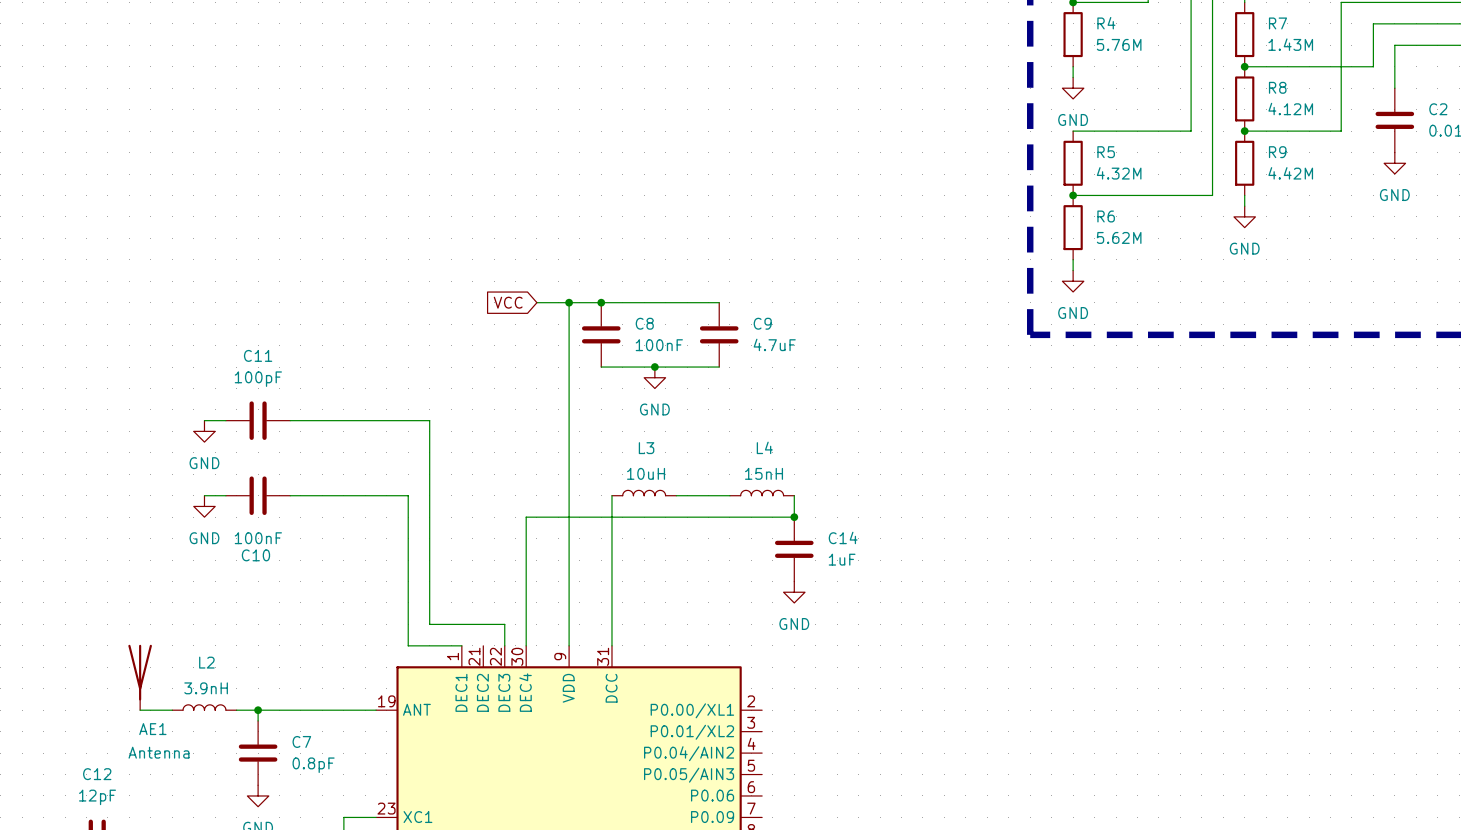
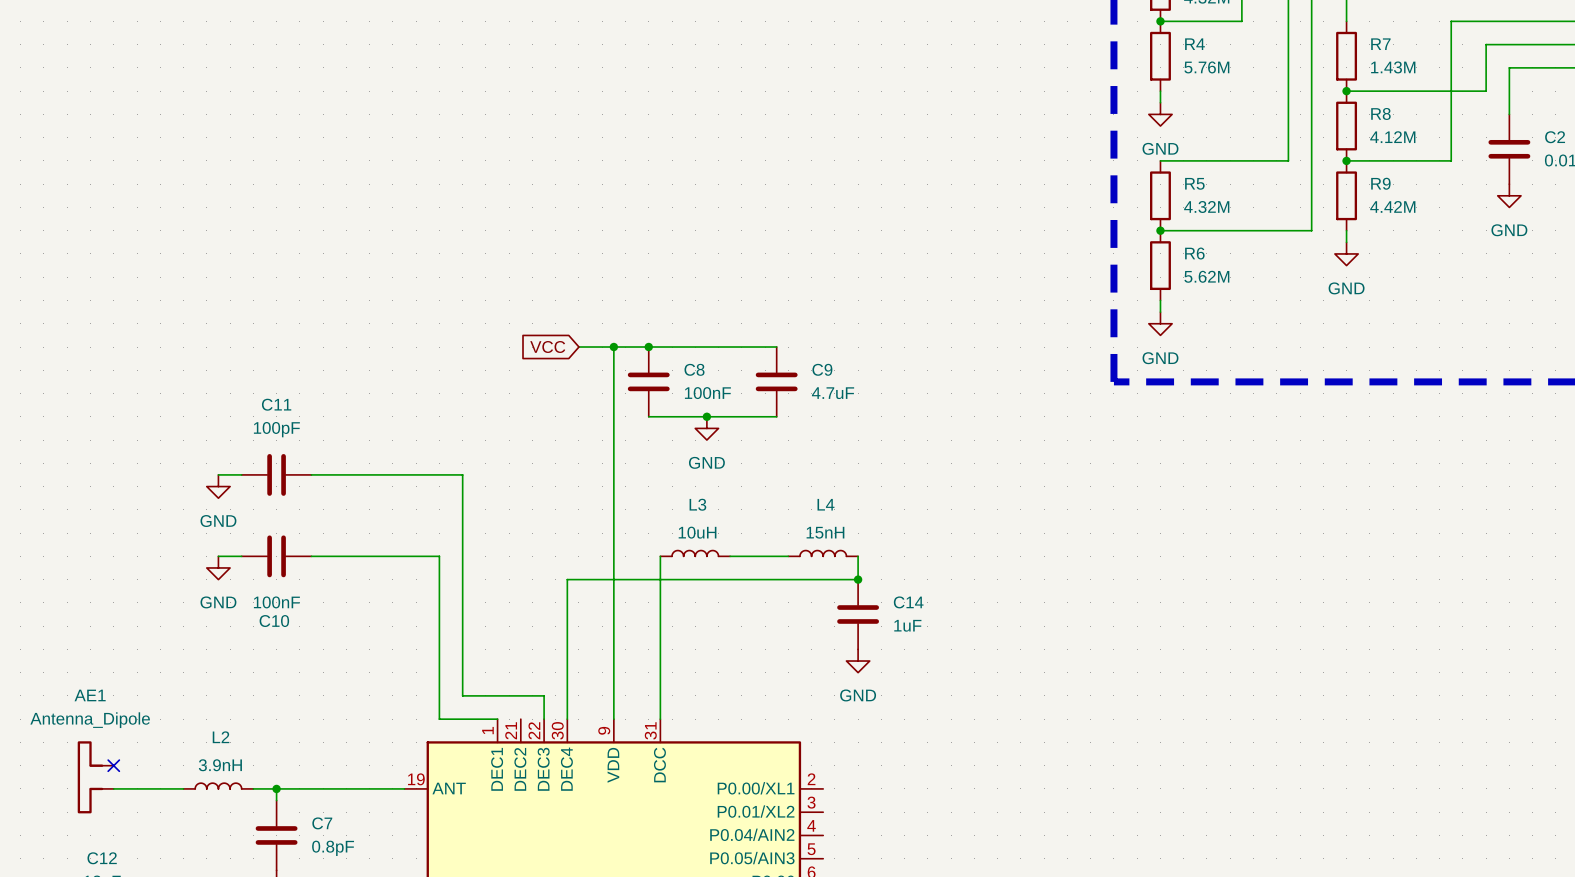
AE1 symbol: [128, 644, 152, 711] -> [77, 741, 114, 814]
no-connect mark: none -> (113, 765)
wire: none -> (113, 788) (148, 788)
AE1 name position: AE1 (152, 729) -> AE1 (90, 695)
AE1 value: Antenna (159, 752) -> Antenna_Dipole (90, 720)

